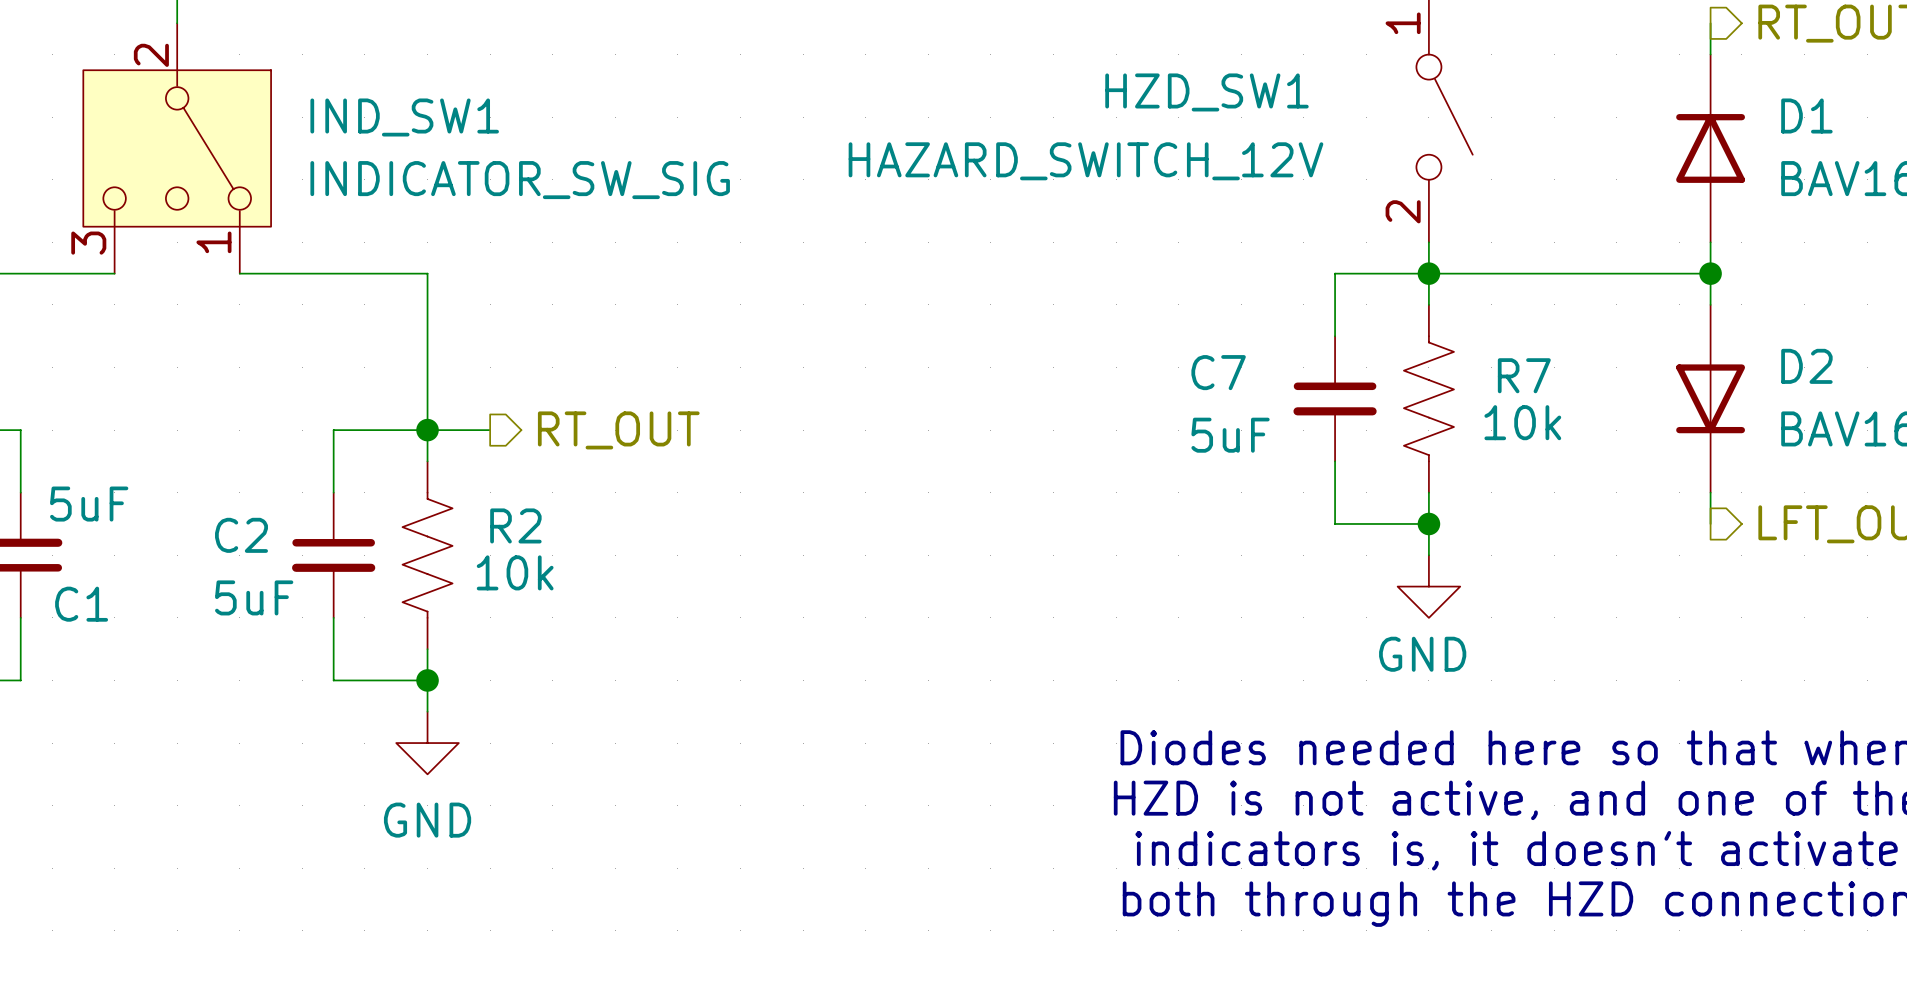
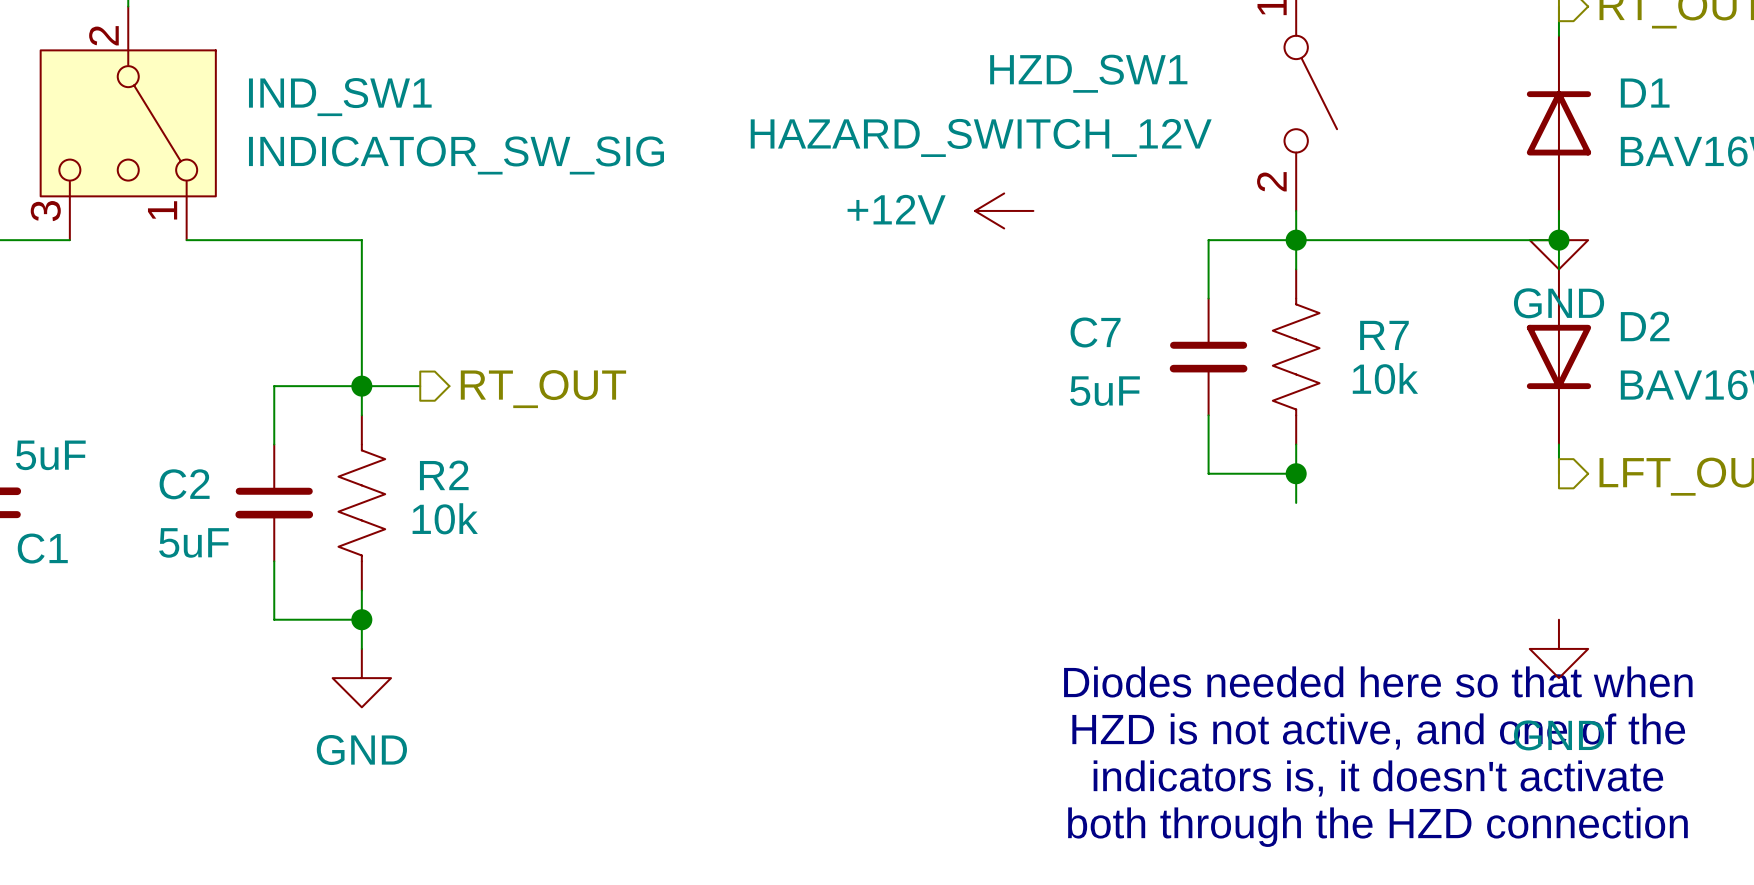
power symbol: none -> +12V (1004, 210)
power symbol: none -> GND (1558, 240)
power symbol: GND (1428, 586) -> none
power symbol: none -> GND (1558, 648)

